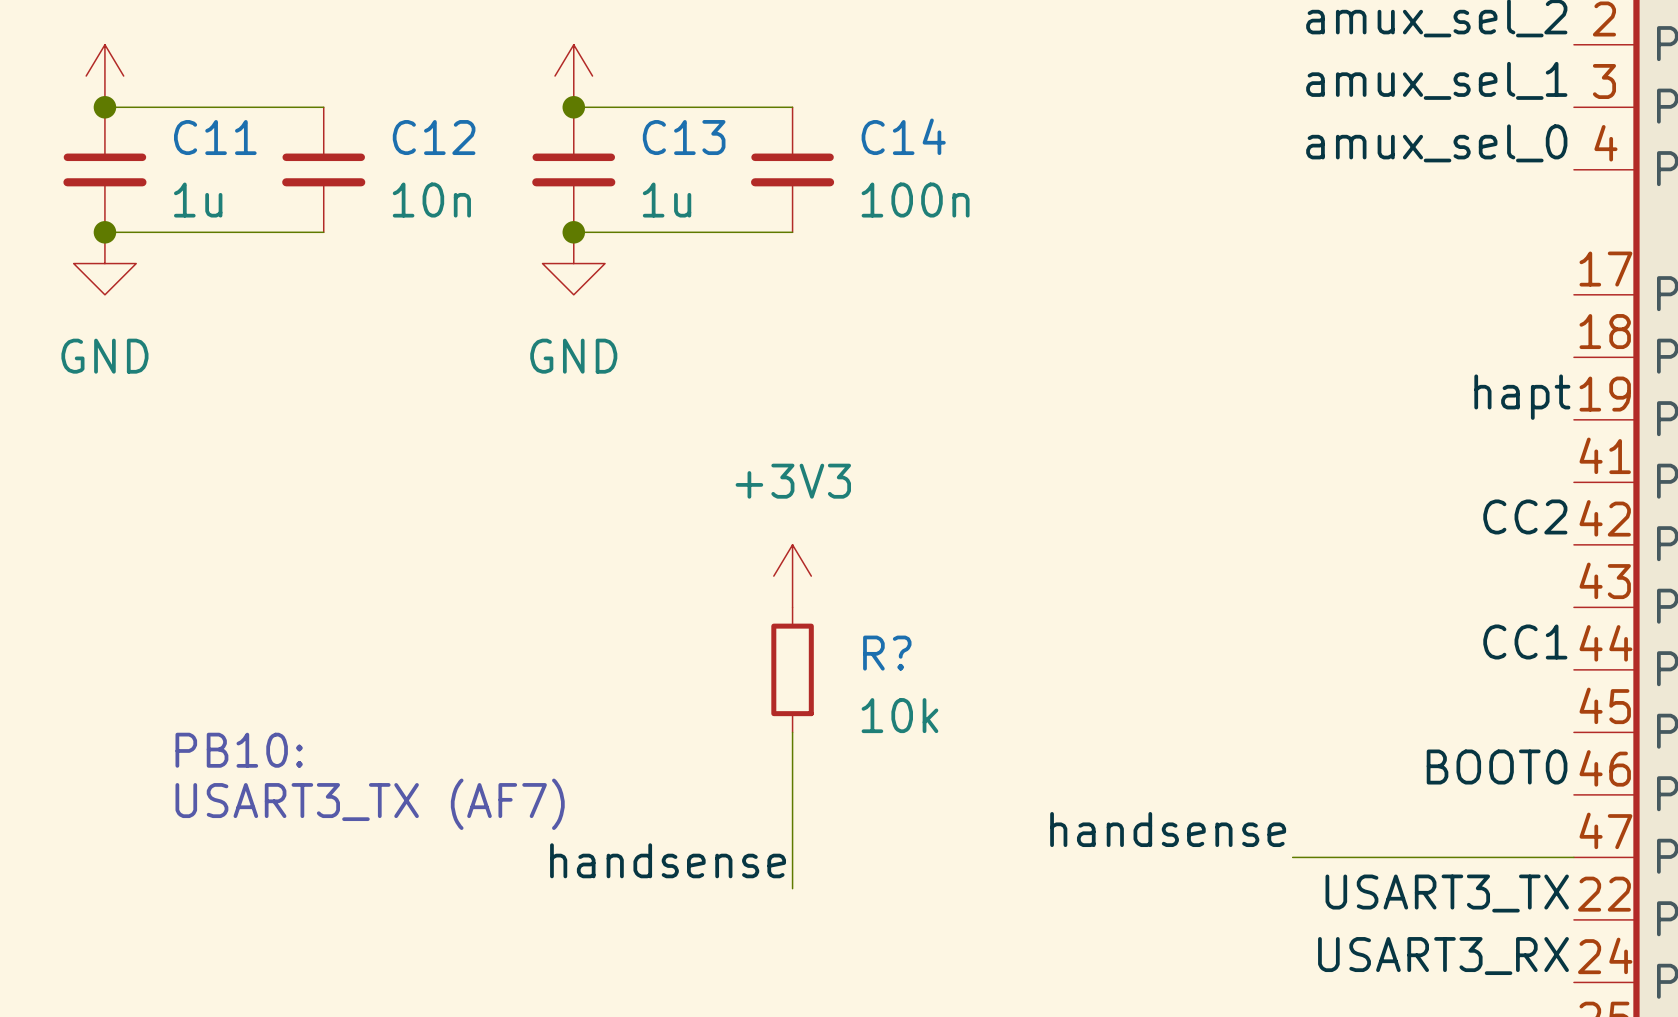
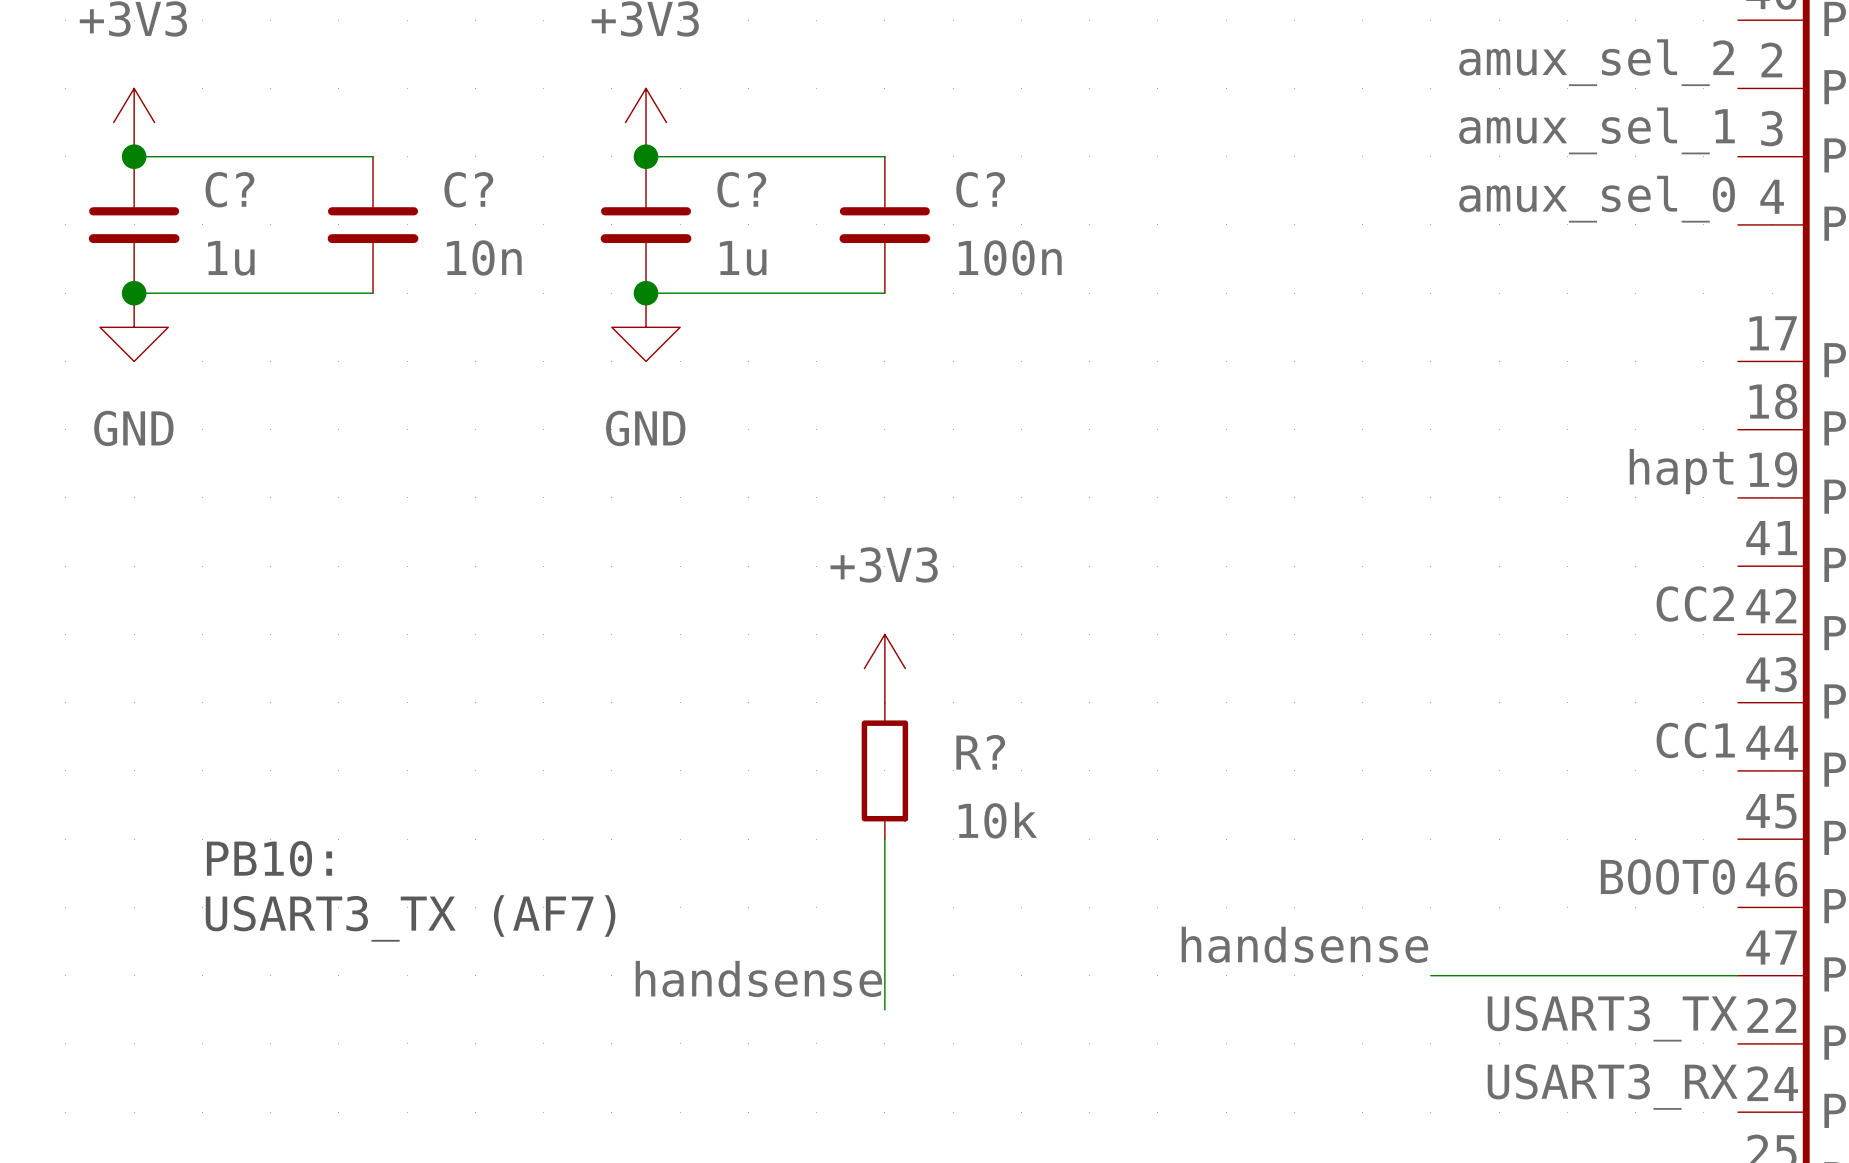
C14 name: C14 (903, 136) -> C? (980, 189)
C11 name: C11 (215, 137) -> C? (229, 189)
C12 name: C12 (434, 137) -> C? (468, 189)
C13 name: C13 (684, 137) -> C? (741, 189)

